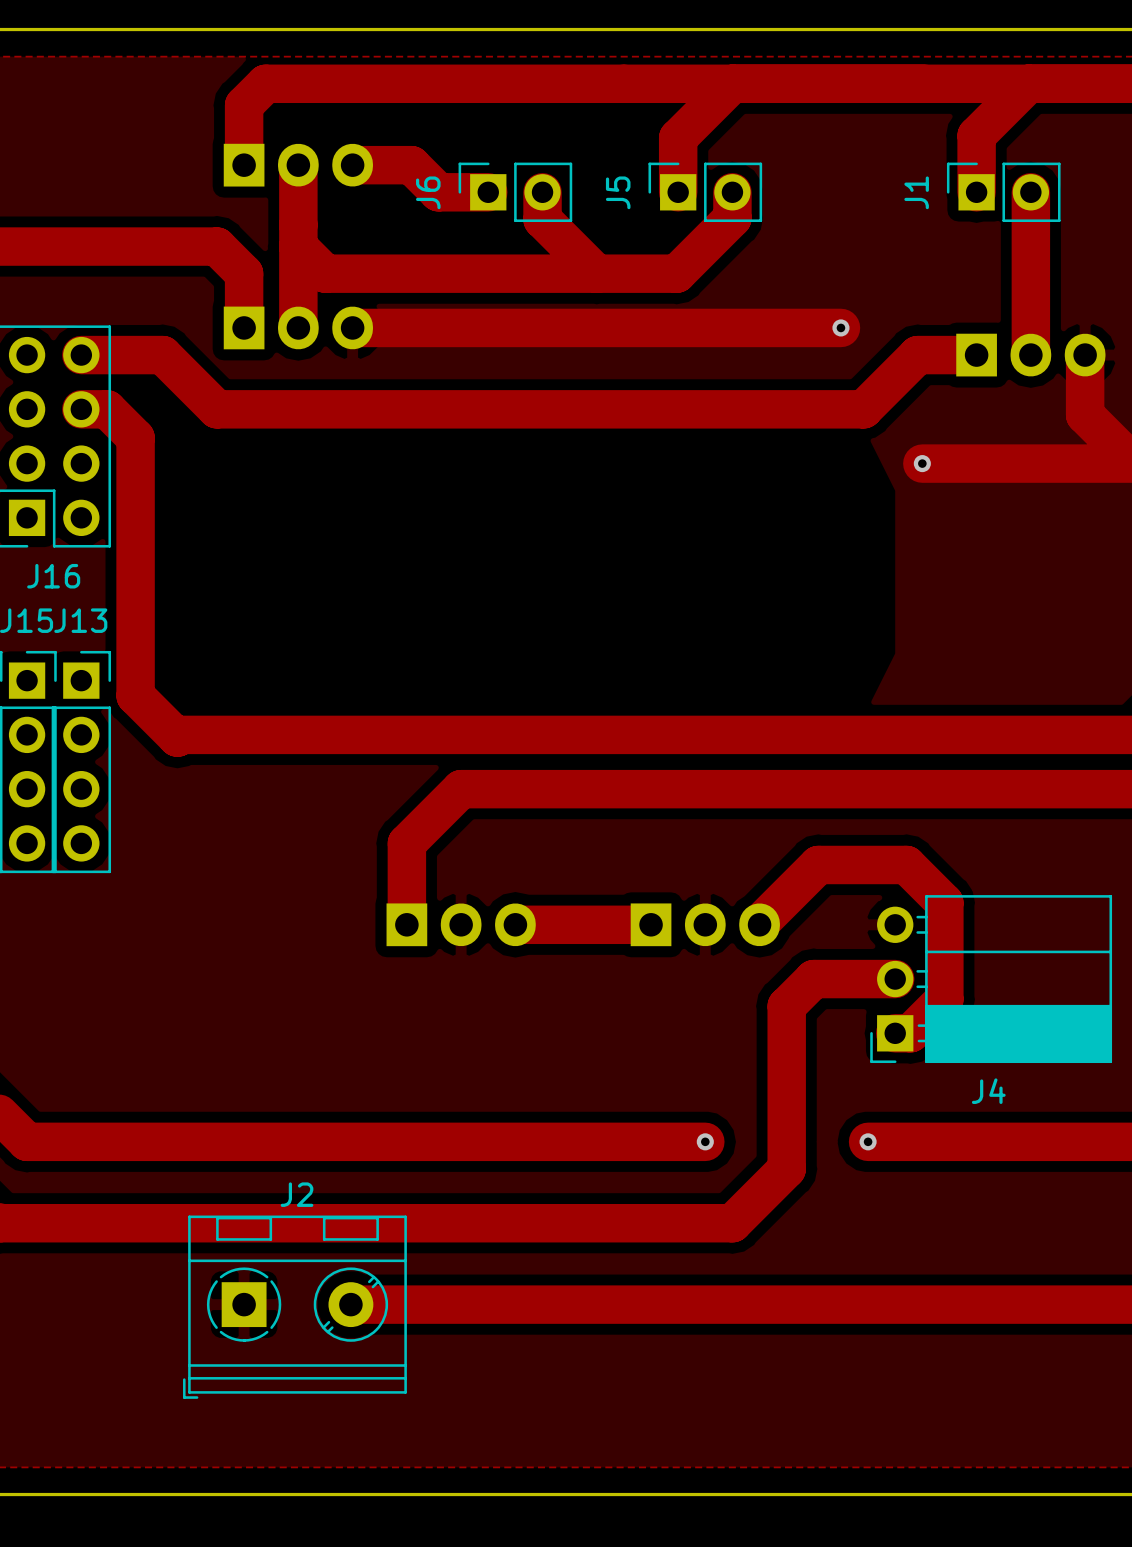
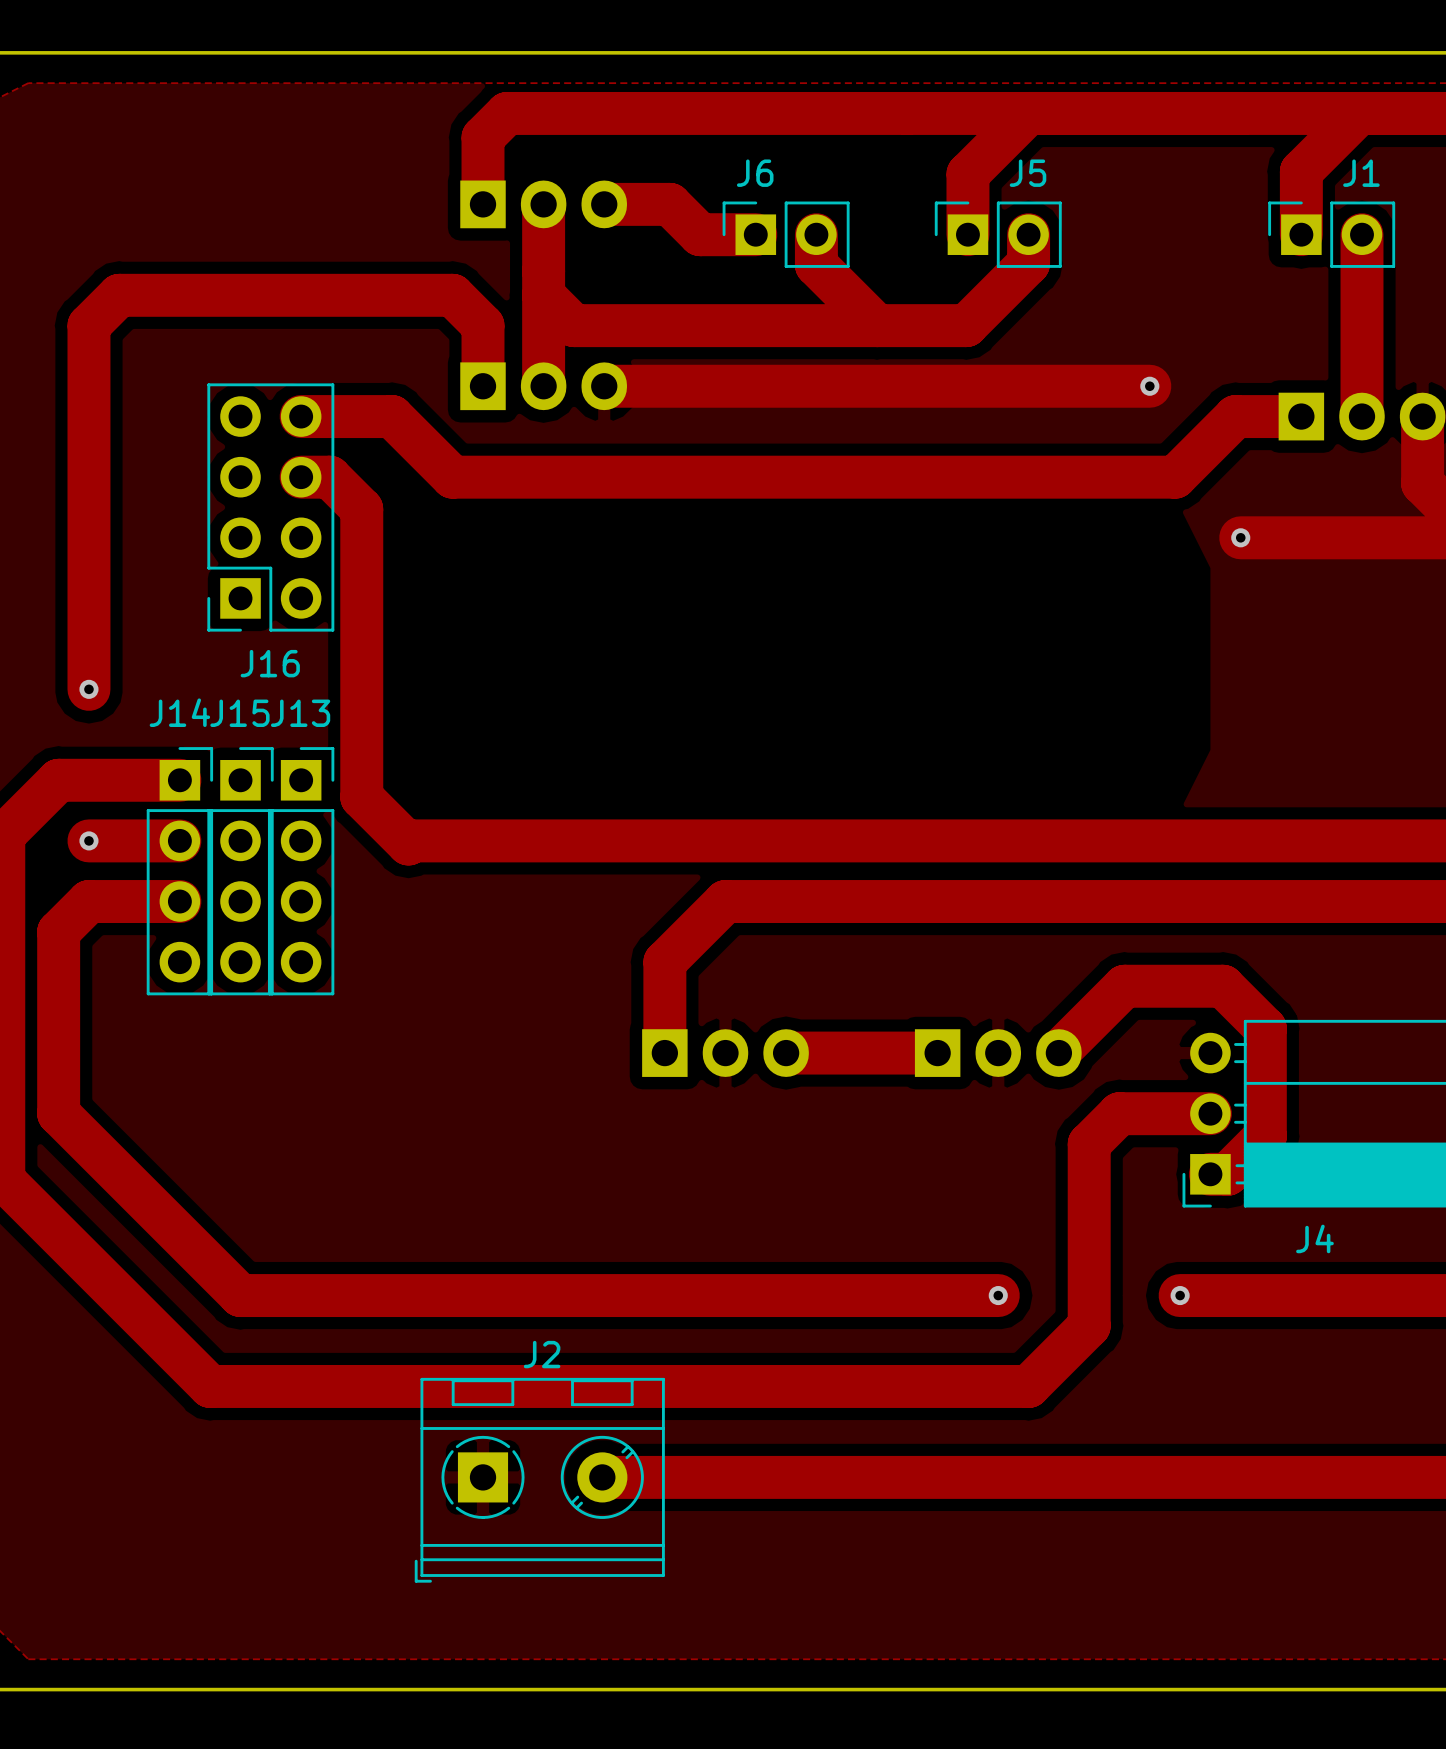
J6 name rotation: 0° (428, 192) -> 90° clockwise (755, 173)
J6 name position: J6 (428, 192) -> J6 (755, 173)
J5 name rotation: 0° (618, 192) -> 90° clockwise (1028, 173)
J5 name position: J5 (618, 192) -> J5 (1028, 173)
J1 name rotation: 0° (916, 192) -> 90° clockwise (1361, 173)
J1 name position: J1 (916, 192) -> J1 (1361, 173)

